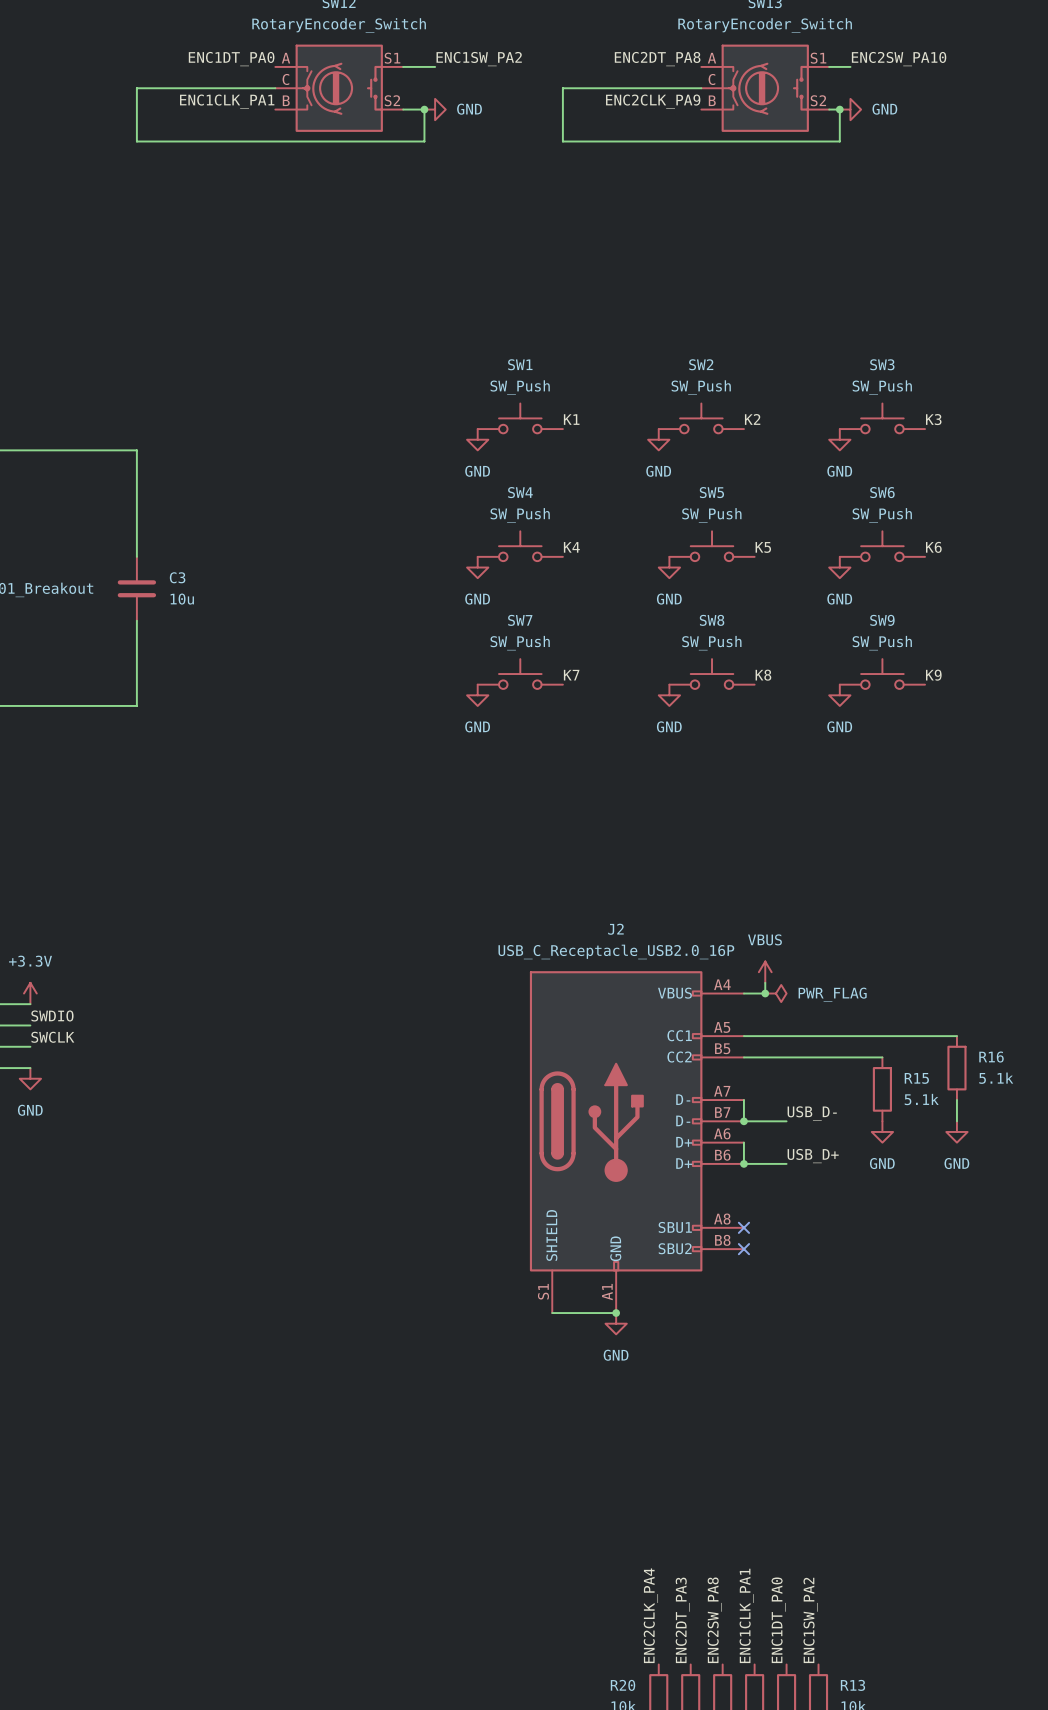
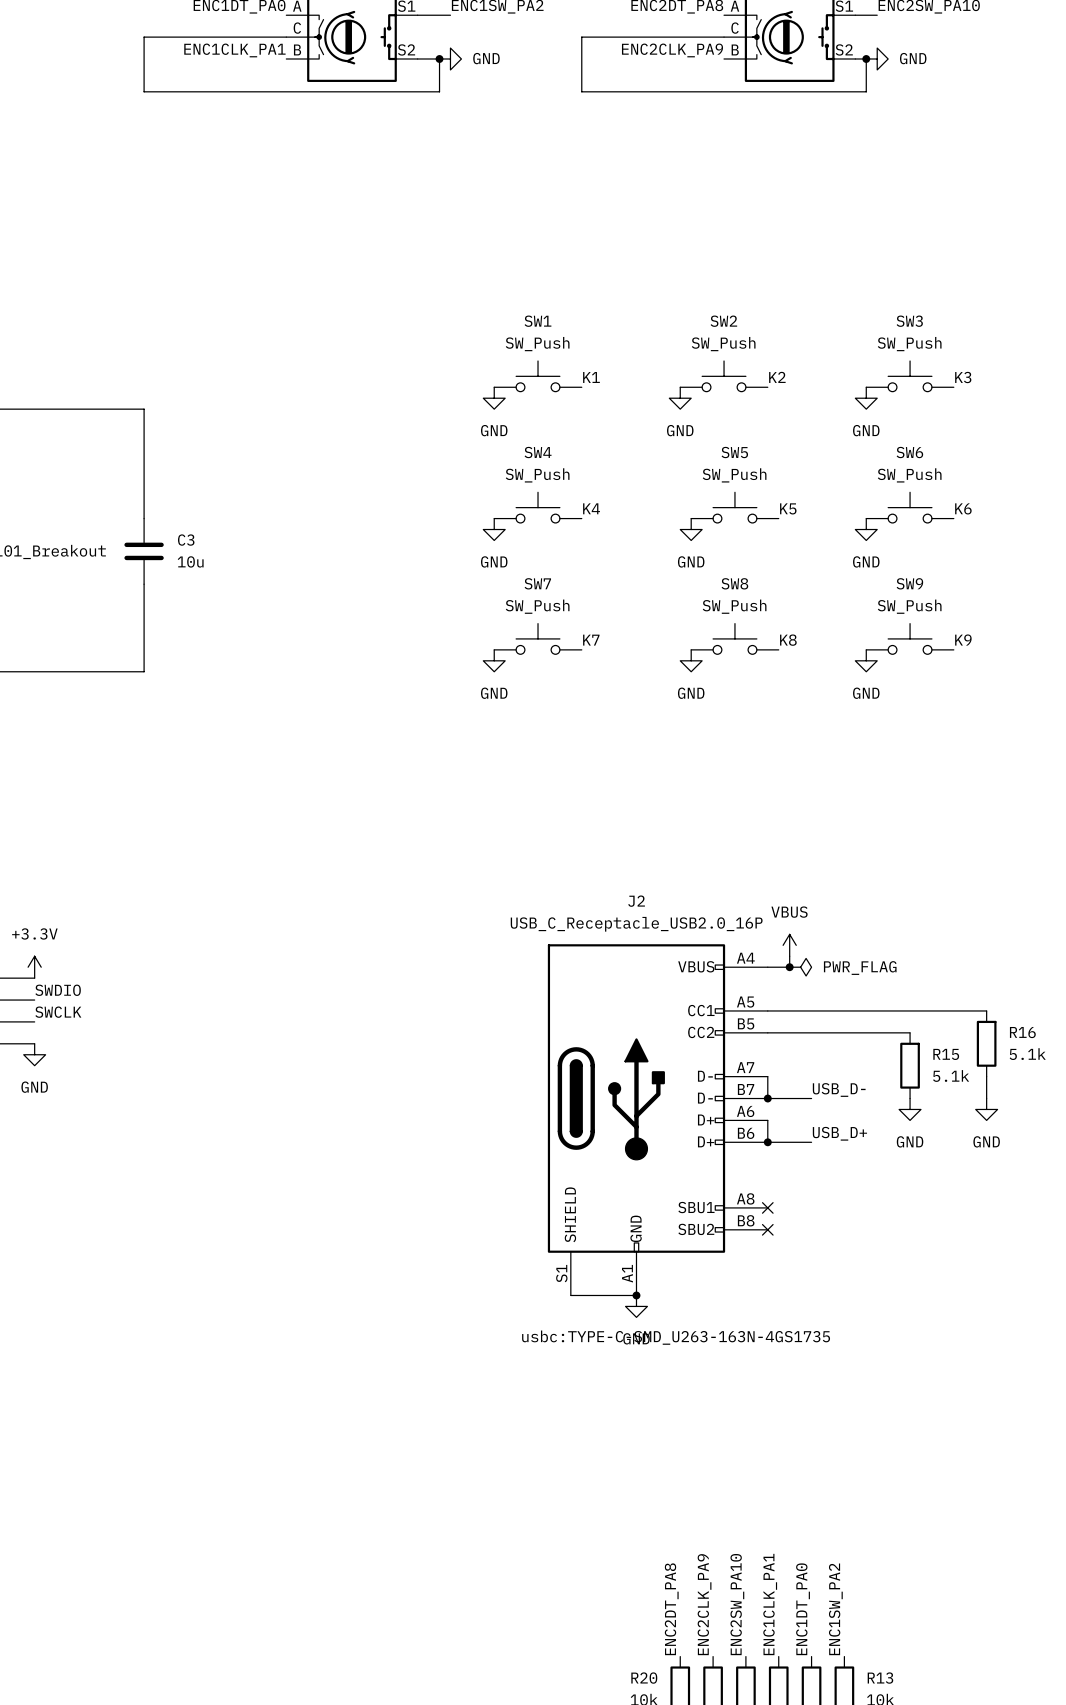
J2 text: none -> usbc:TYPE-C-SMD_U263-163N-4GS1735 (676, 1337)
label: ENC2CLK_PA4 (650, 1615) -> ENC2DT_PA8 (671, 1609)
label: ENC2DT_PA3 (682, 1620) -> ENC2CLK_PA9 (704, 1604)
label: ENC2SW_PA8 (714, 1620) -> ENC2SW_PA10 (737, 1604)

